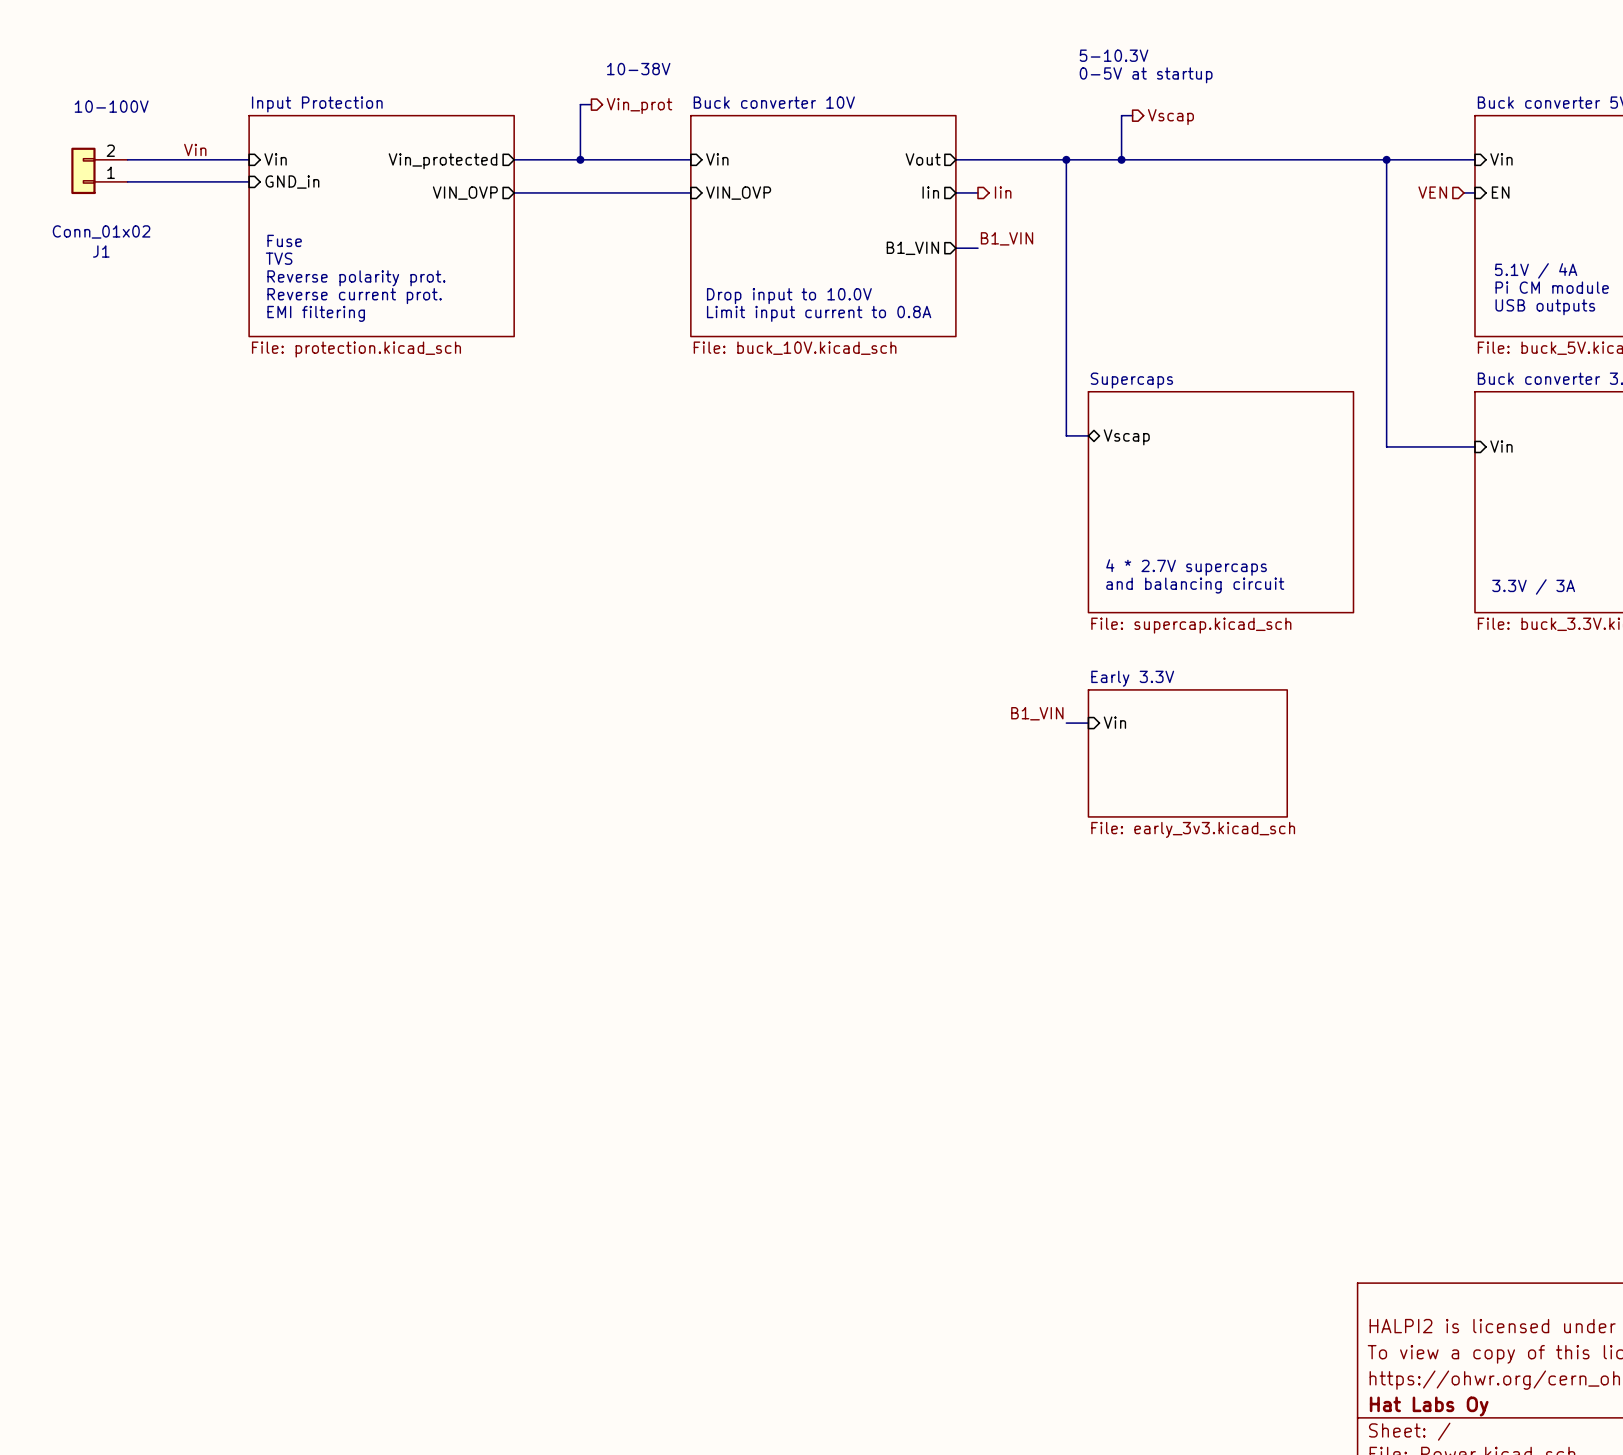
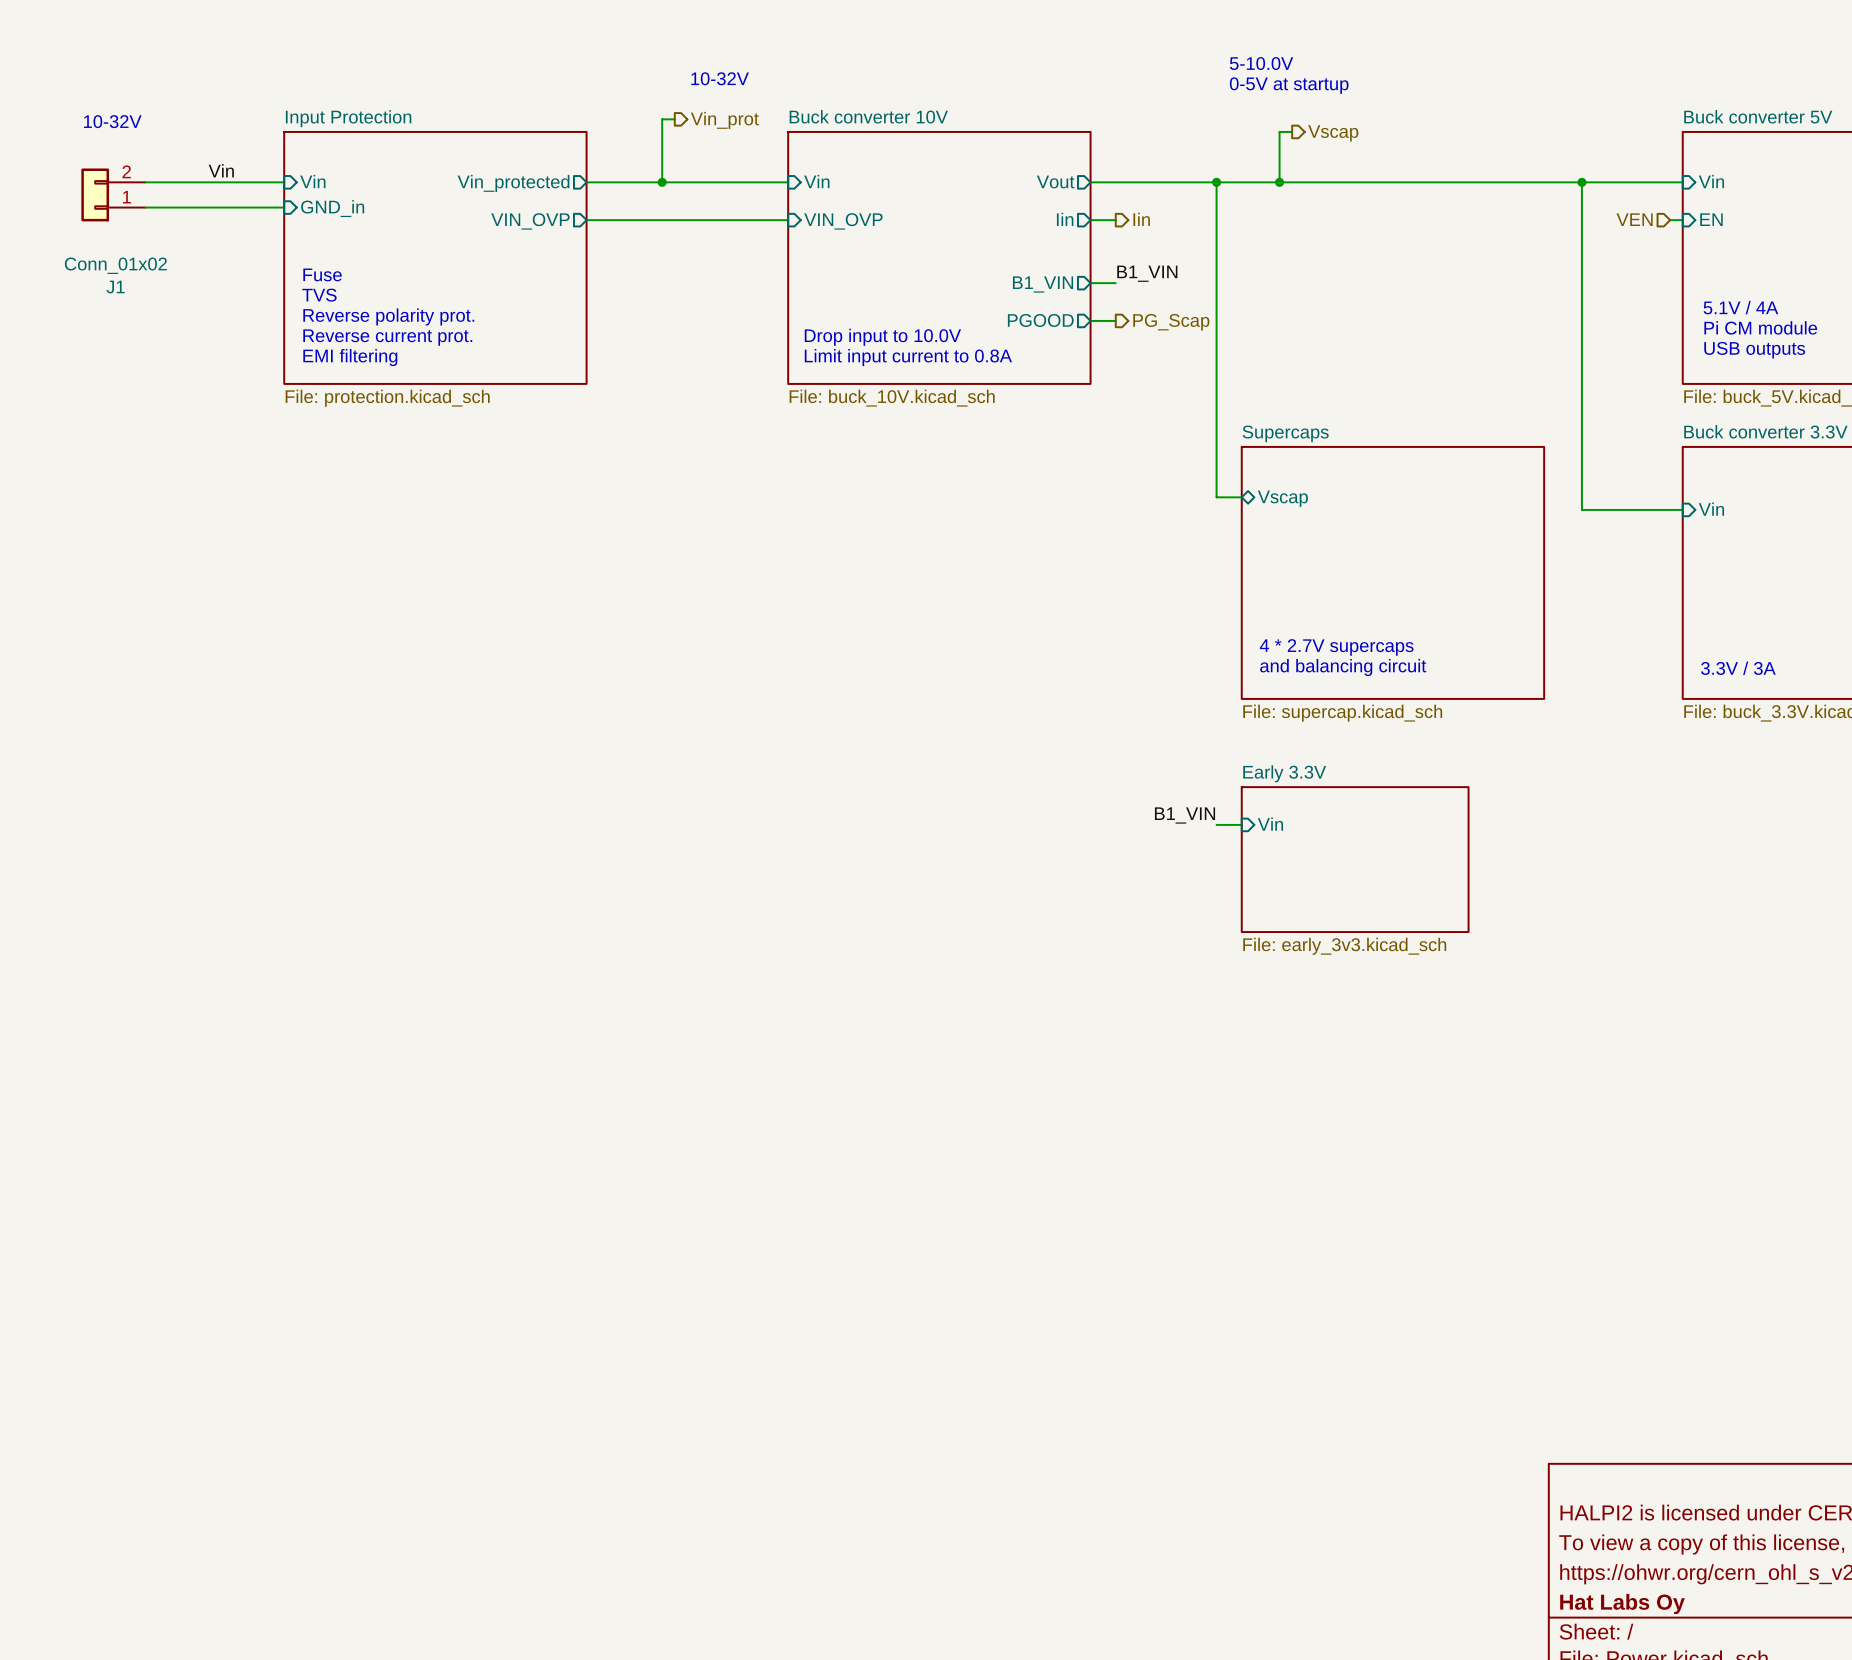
text: 5-10.3V (1114, 55) -> 5-10.0V (1261, 63)
text: 10-38V (638, 69) -> 10-32V (720, 78)
text: 10-100V (111, 106) -> 10-32V (112, 121)
sheet pin: none -> PGOOD (1040, 320)
wire: none -> (1090, 320) (1115, 320)
hierarchical label: none -> PG_Scap (1171, 322)

